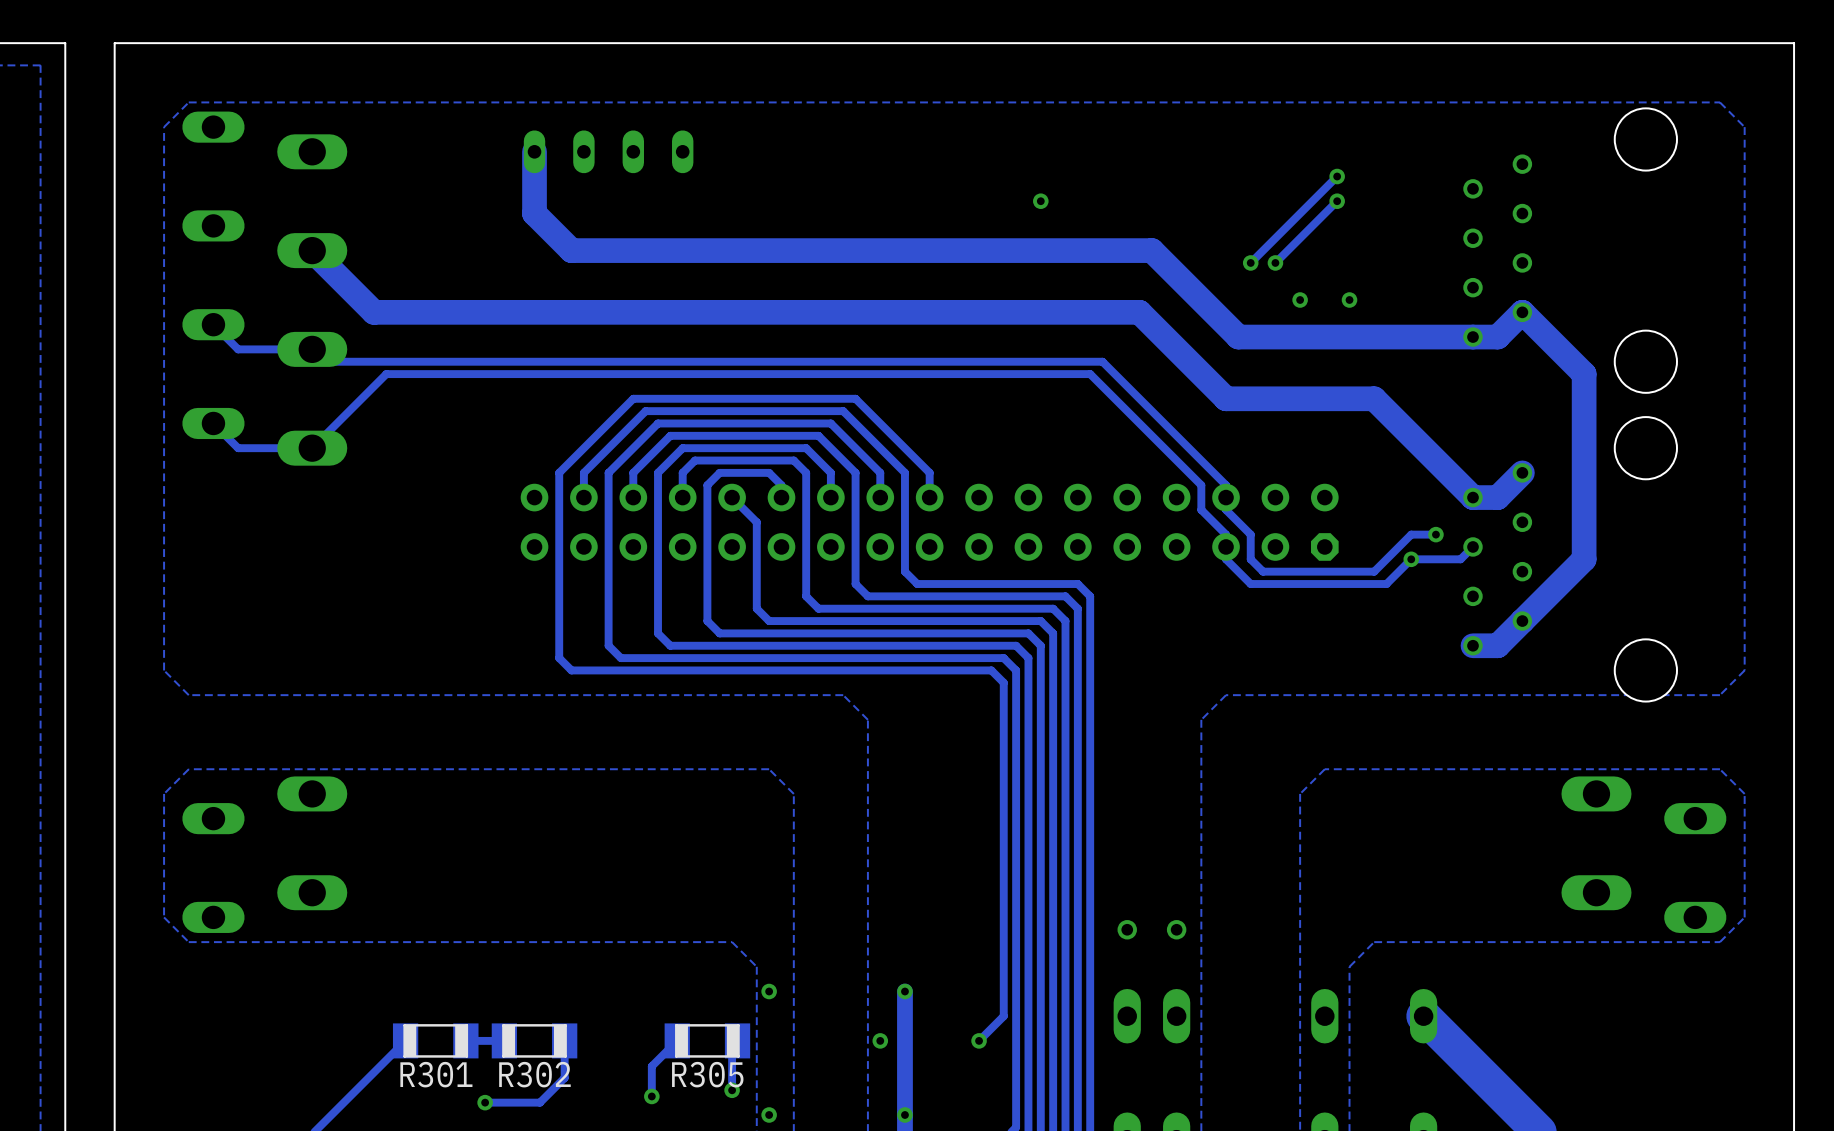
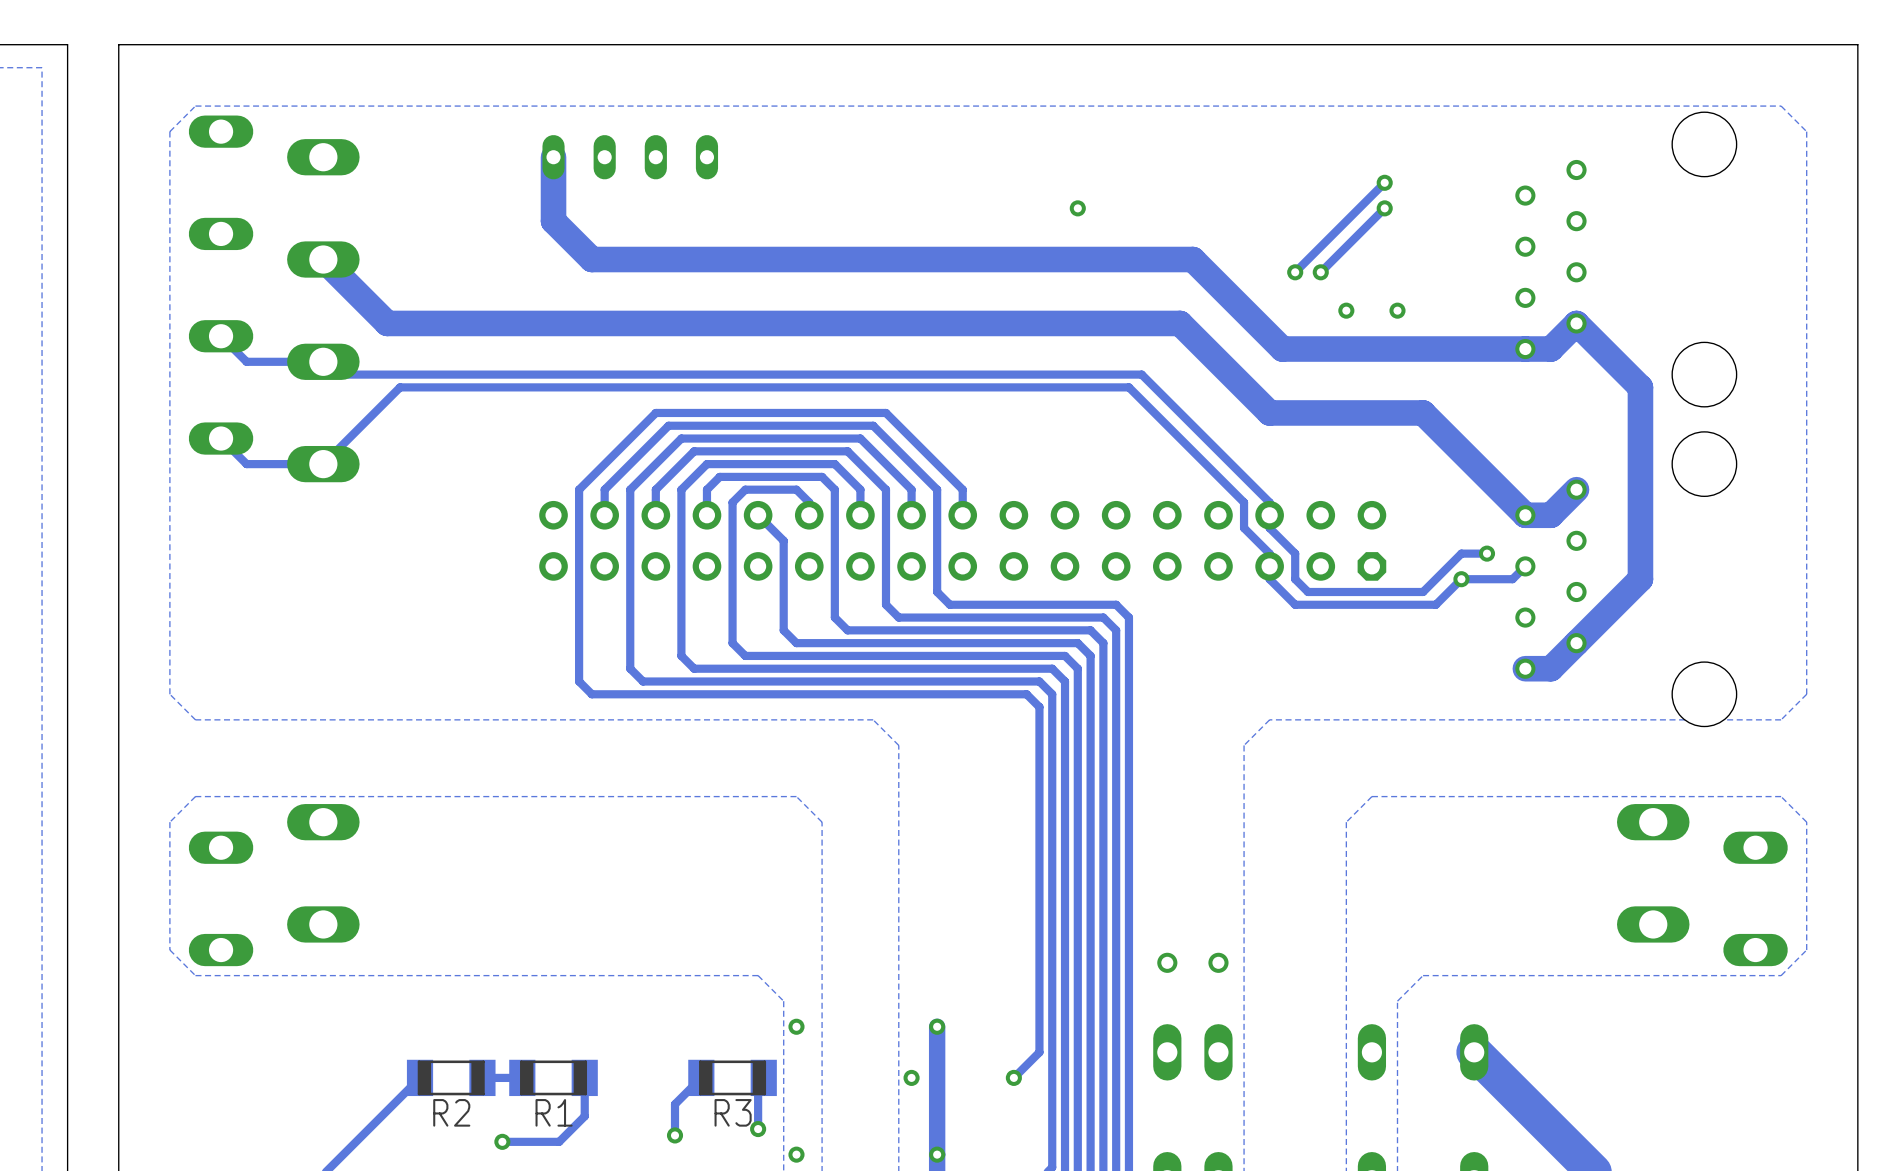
R301 name: R301 (436, 1074) -> R2 (451, 1112)
R302 name: R302 (534, 1074) -> R1 (554, 1112)
R305 name: R305 (707, 1074) -> R3 (733, 1112)

